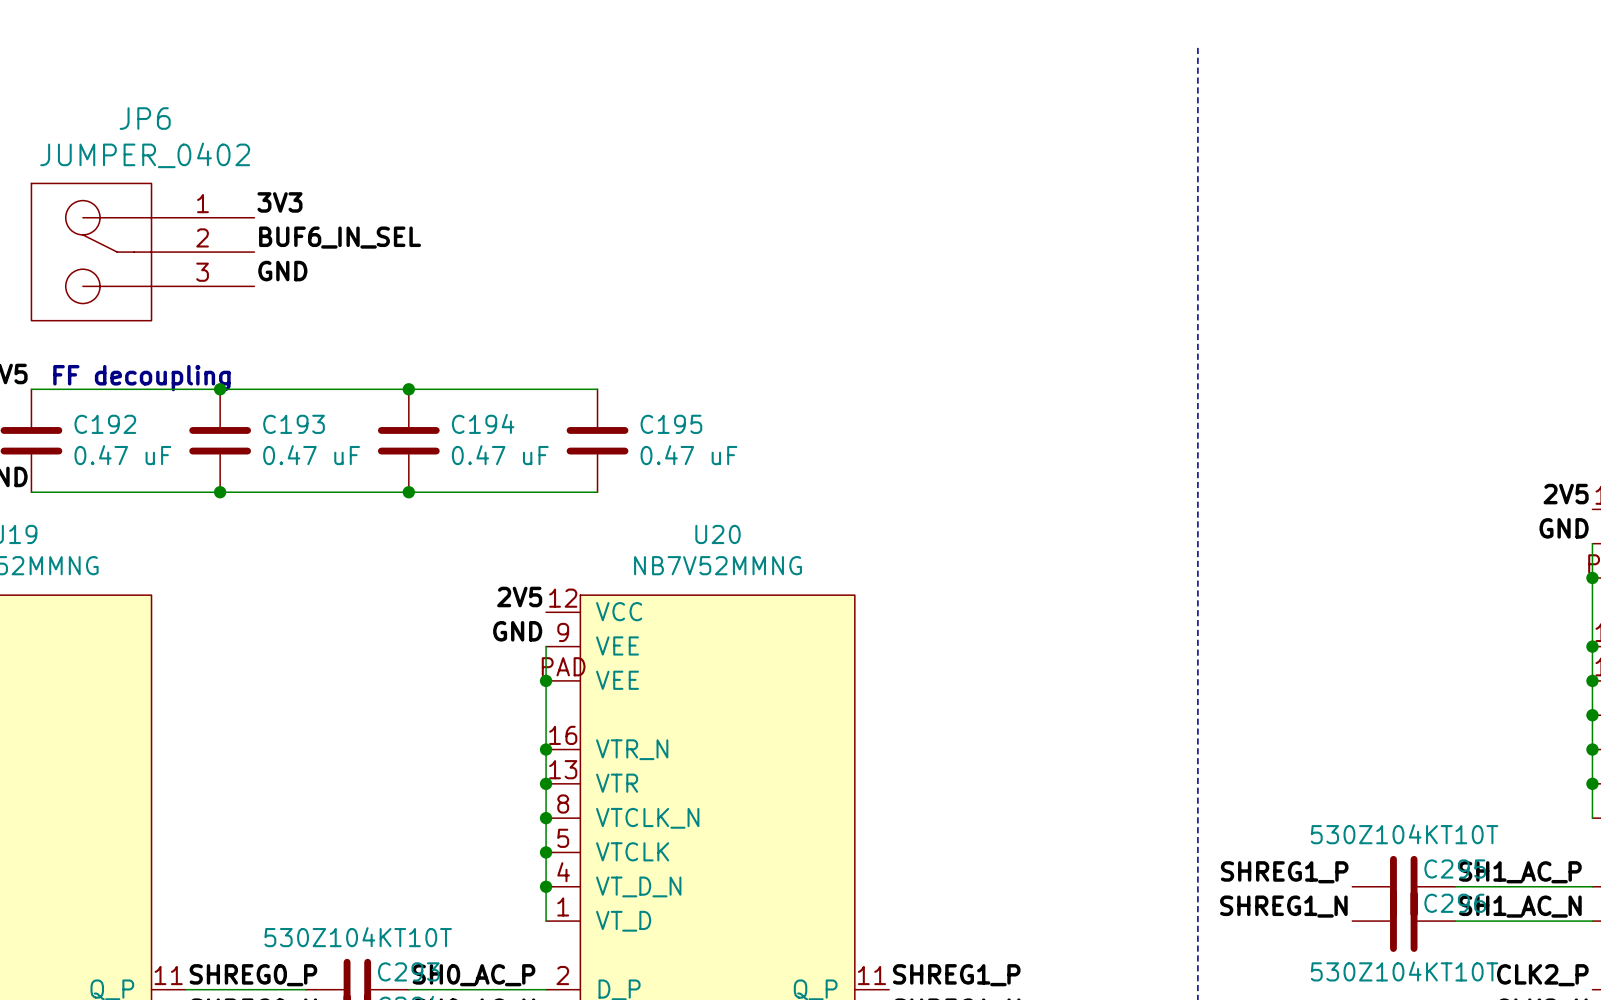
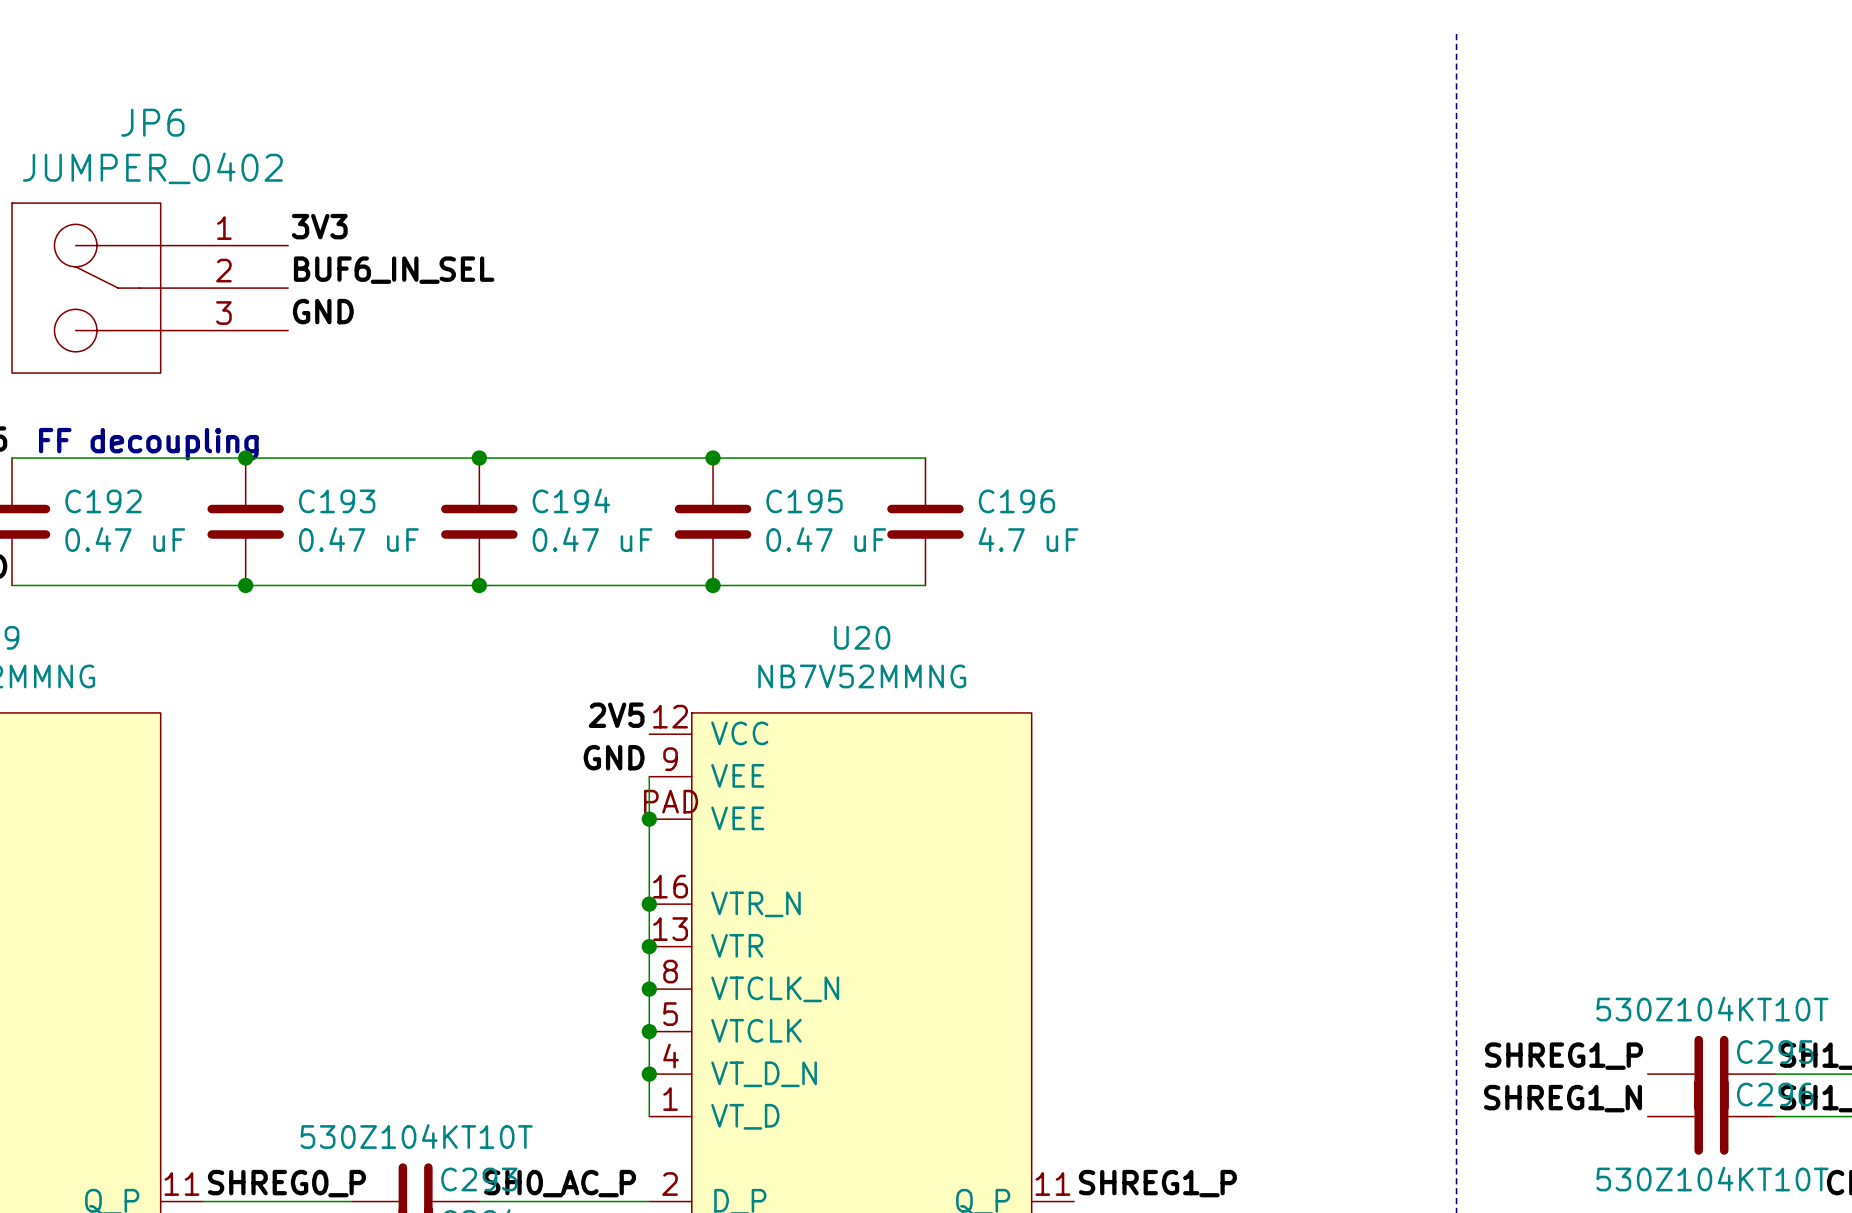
wire: none -> (713, 458) (925, 458)
junction: none -> (713, 458)
C196: none -> 4.7 uF (925, 521)
wire: none -> (713, 585) (925, 585)
junction: none -> (713, 585)

